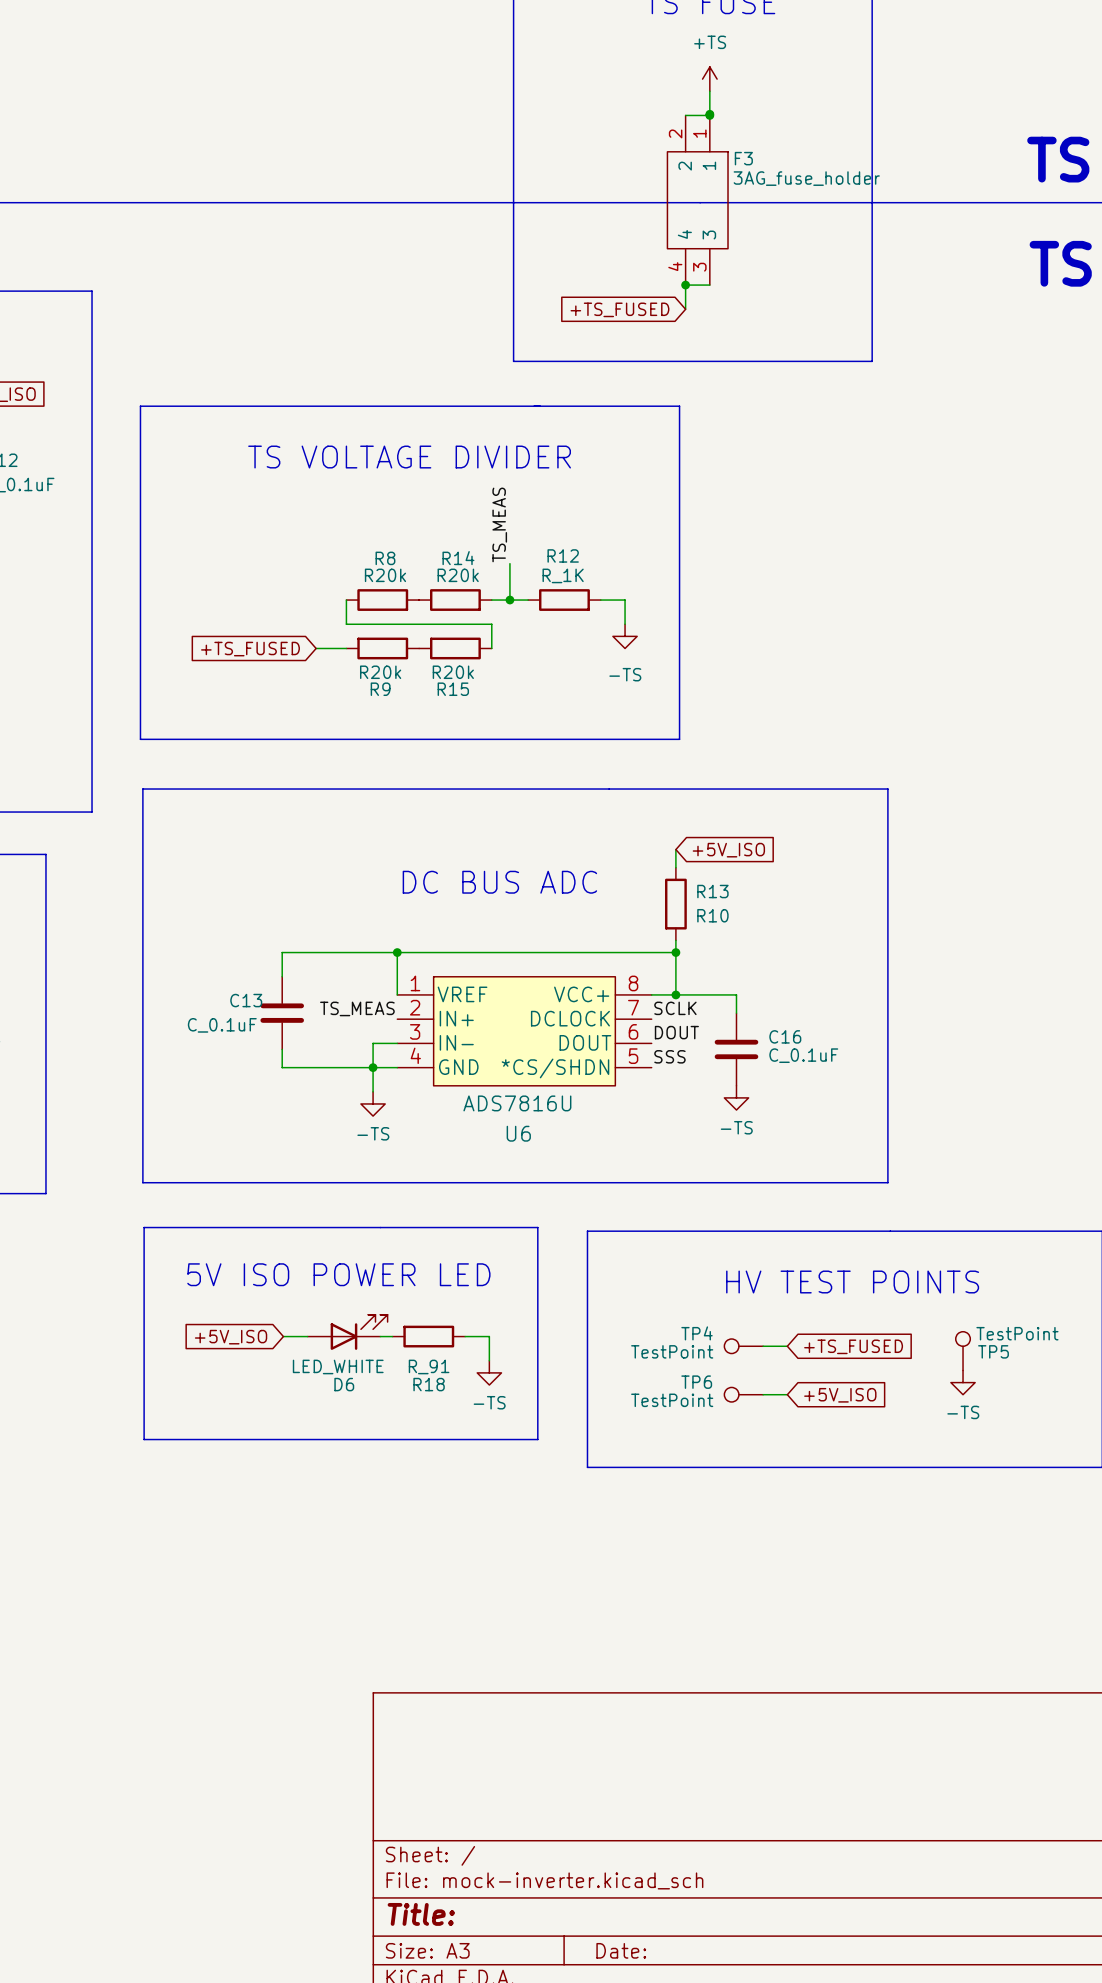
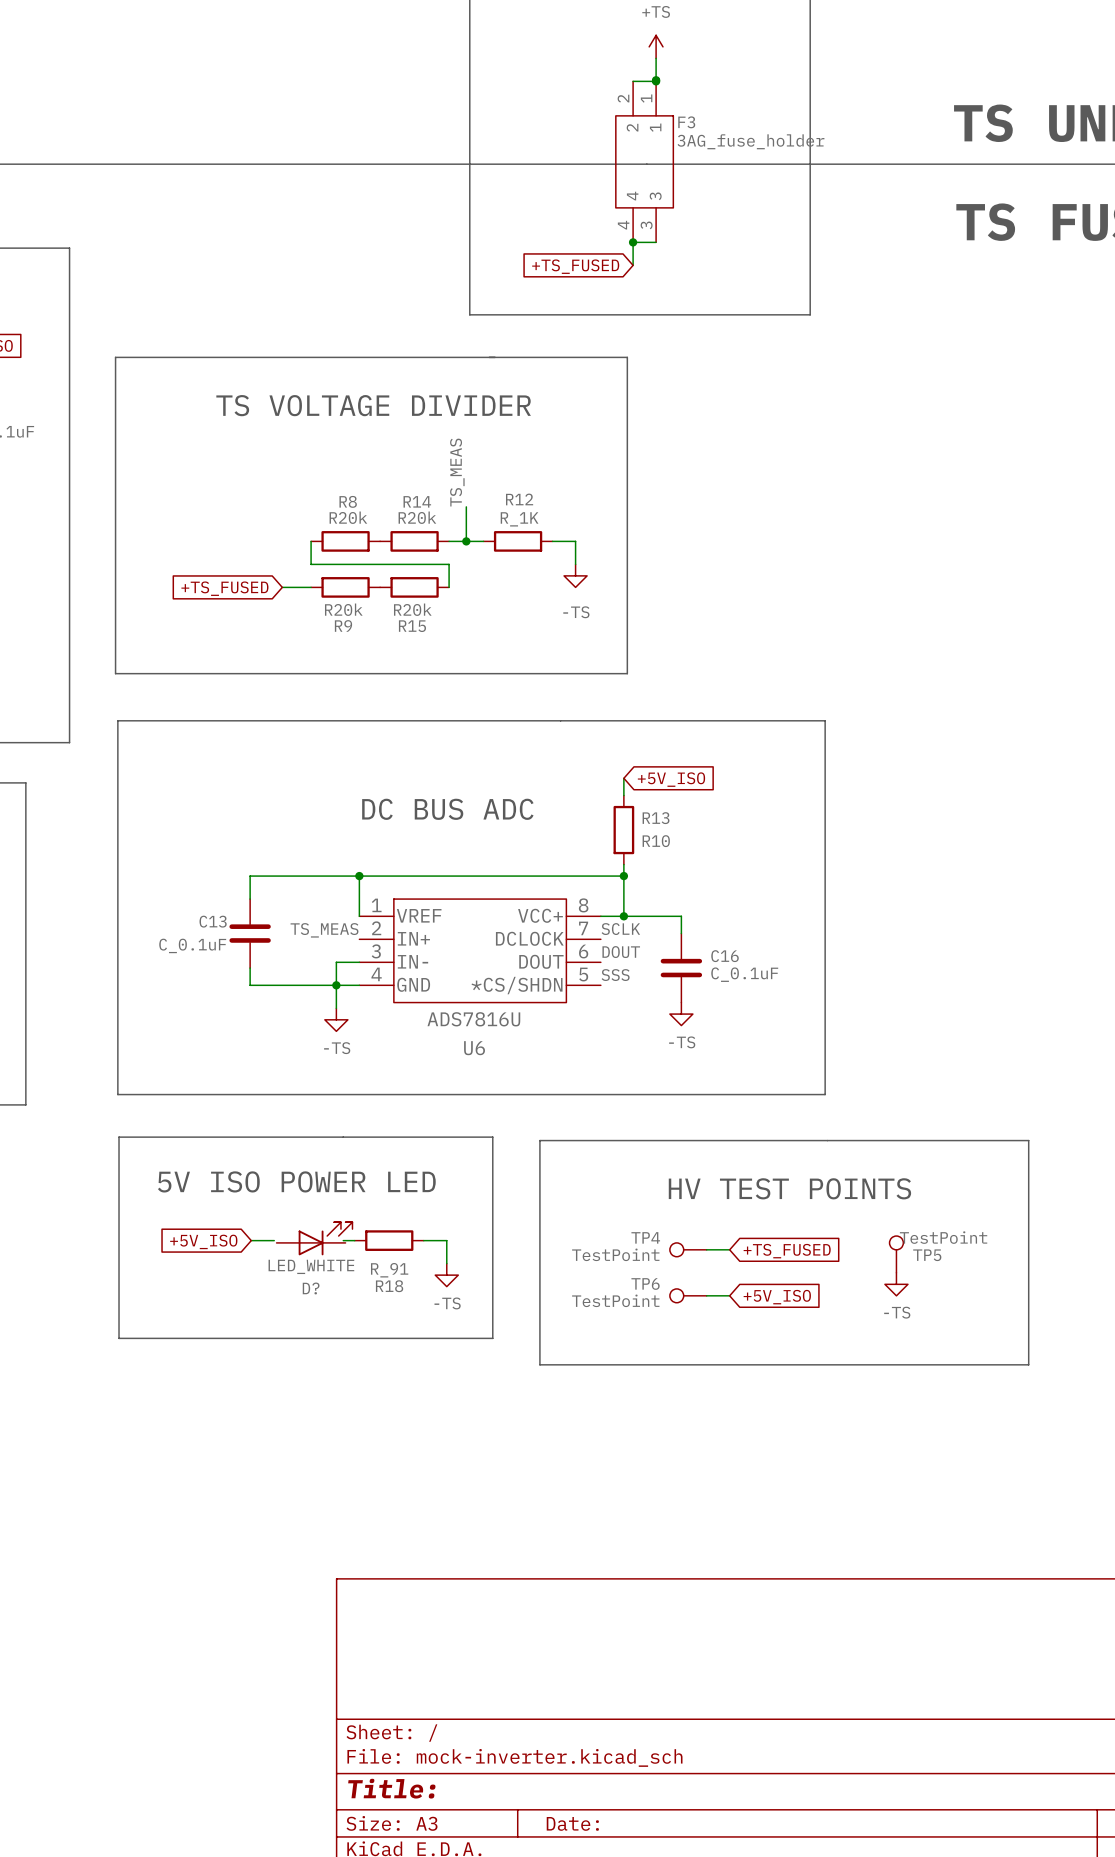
D6: LED_WHITE (347, 1332) -> none
D?: none -> LED_WHITE (314, 1238)

